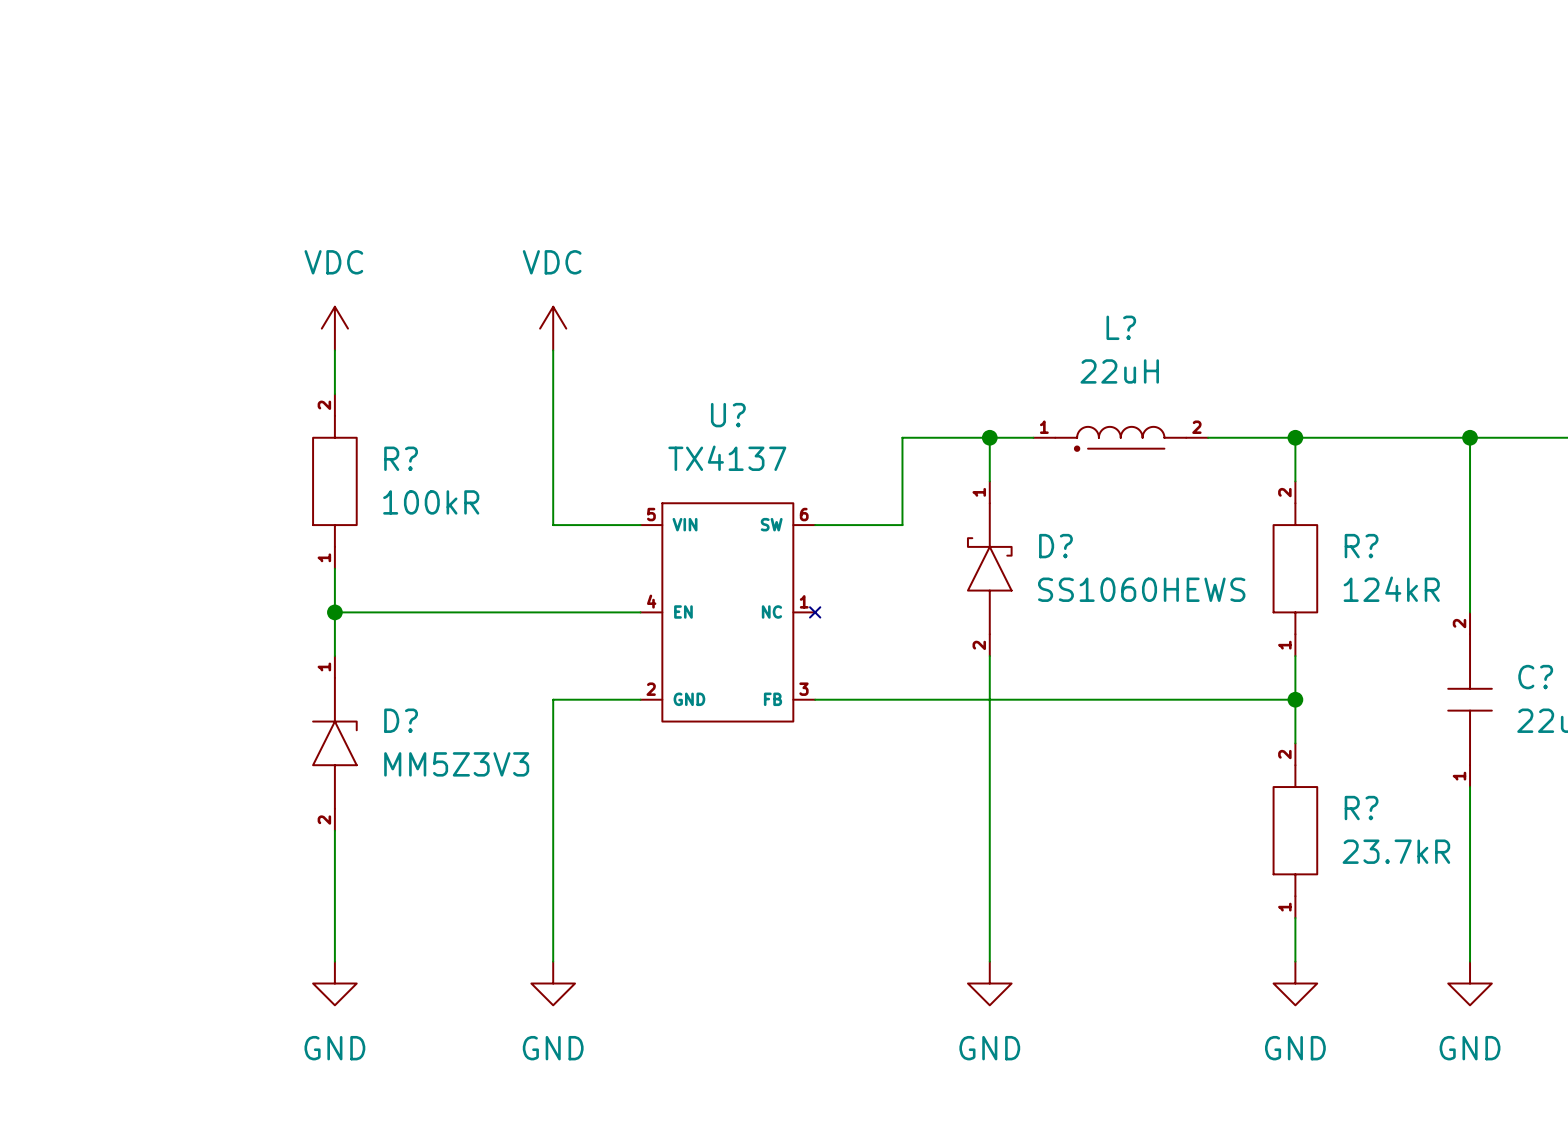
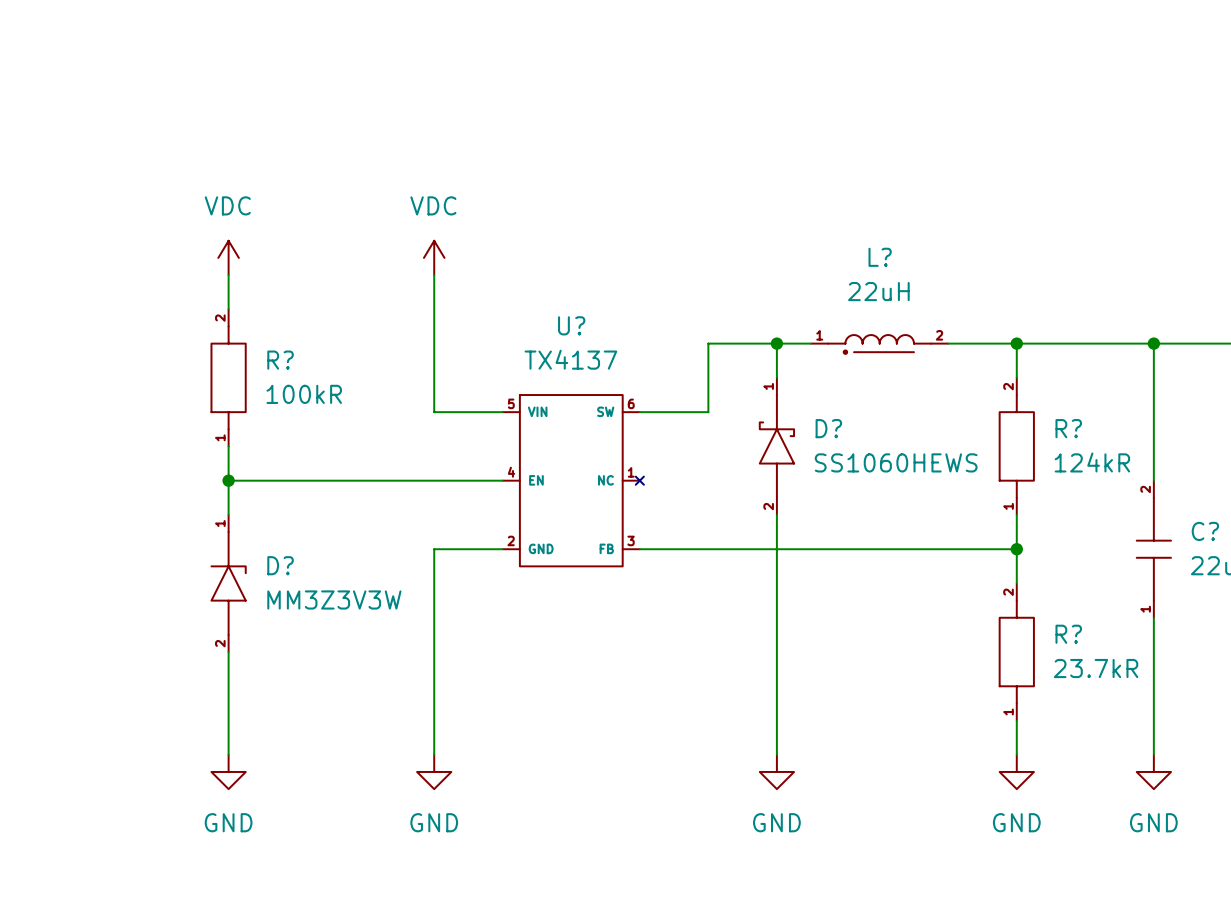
power symbol position: VDC (334, 328) -> VDC (228, 257)
wire: (334, 350) (334, 394) -> (228, 275) (228, 309)
R? position: (334, 481) -> (228, 377)
wire: (334, 568) (334, 656) -> (228, 446) (228, 514)
wire: none -> (228, 480) (262, 480)
junction position: (334, 612) -> (228, 480)
D?: none -> MM3Z3V3W (228, 583)
D?: MM5Z3V3 (334, 743) -> none
wire: (334, 830) (334, 961) -> (228, 652) (228, 754)
power symbol position: GND (334, 983) -> GND (228, 771)

